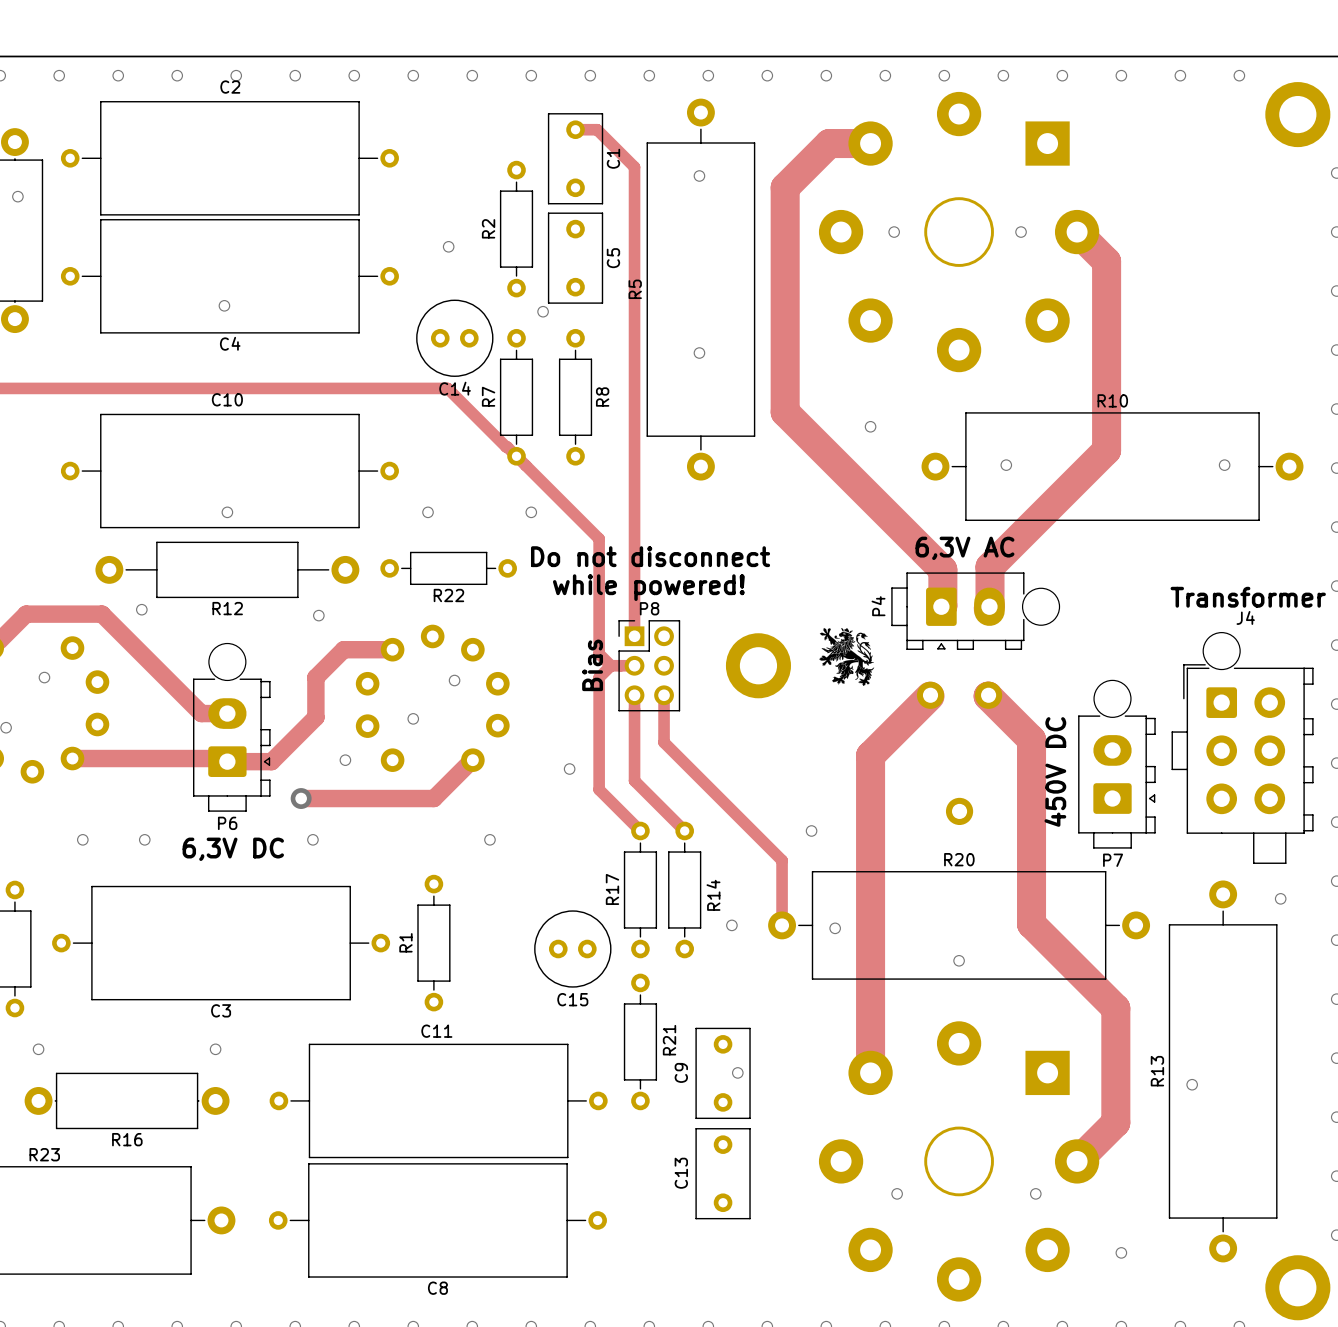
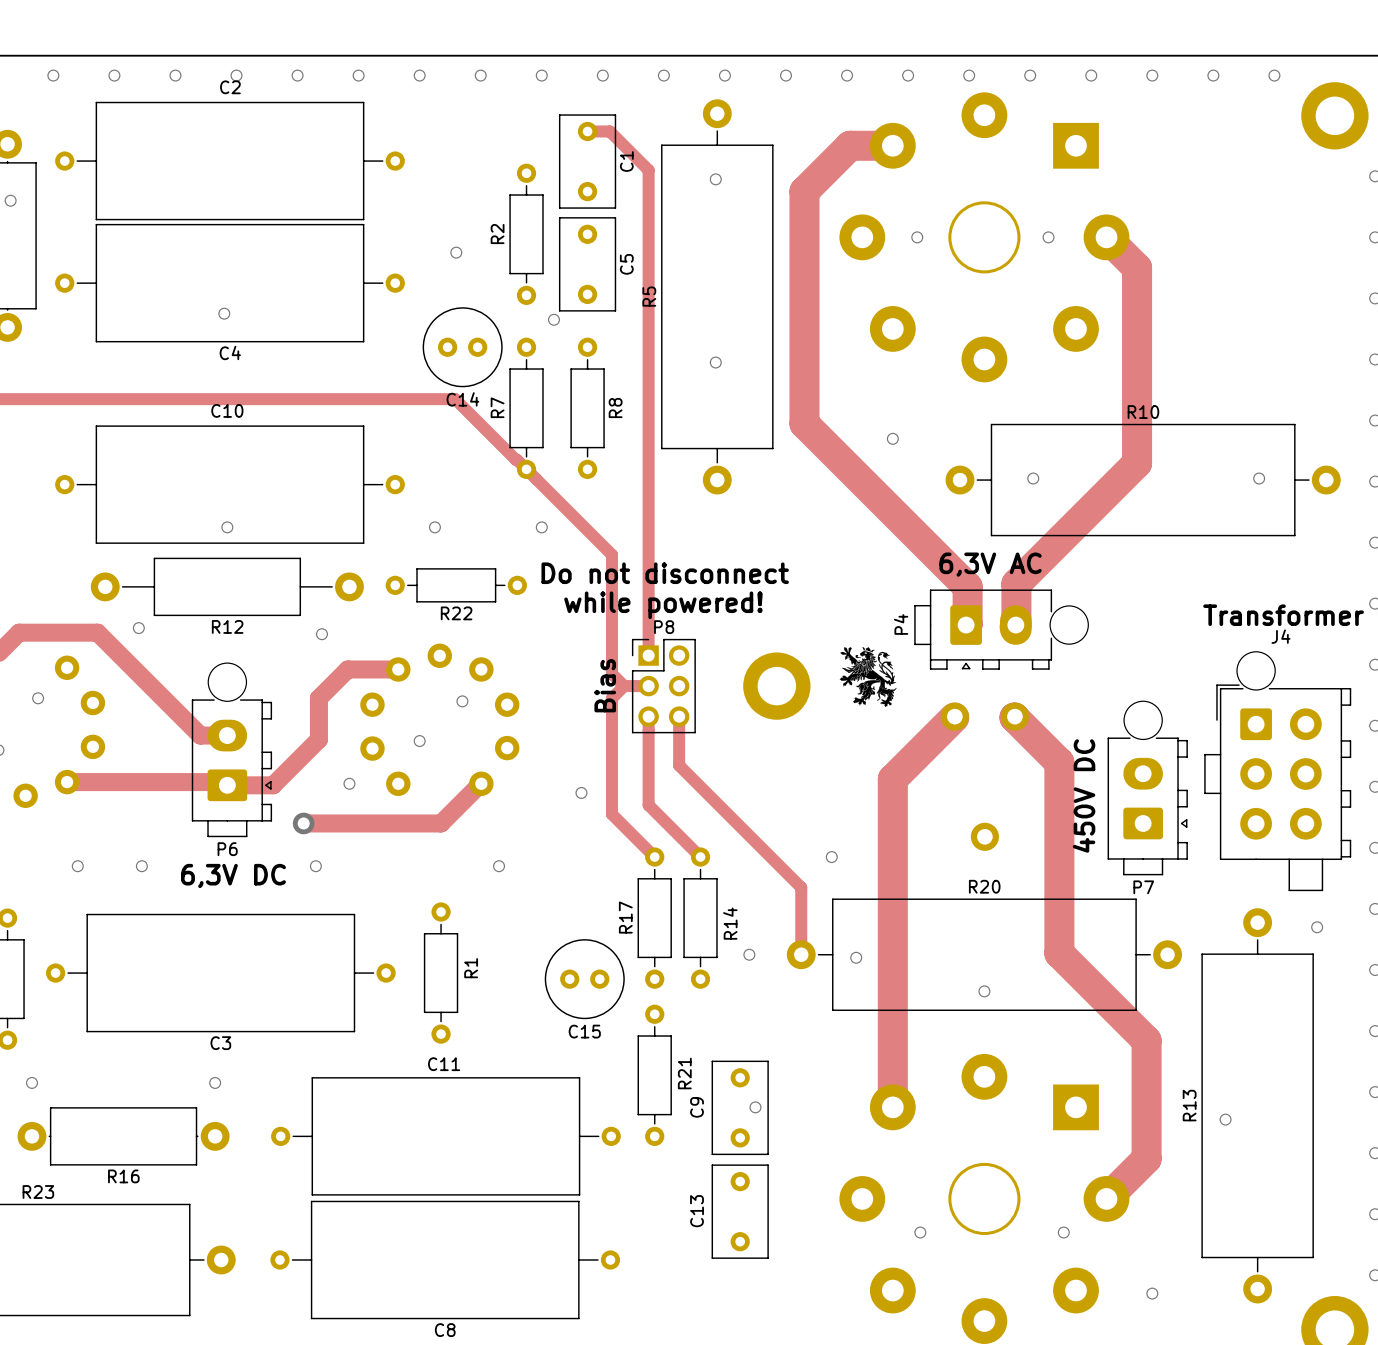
R1 name position: R1 (405, 942) -> R1 (471, 968)

